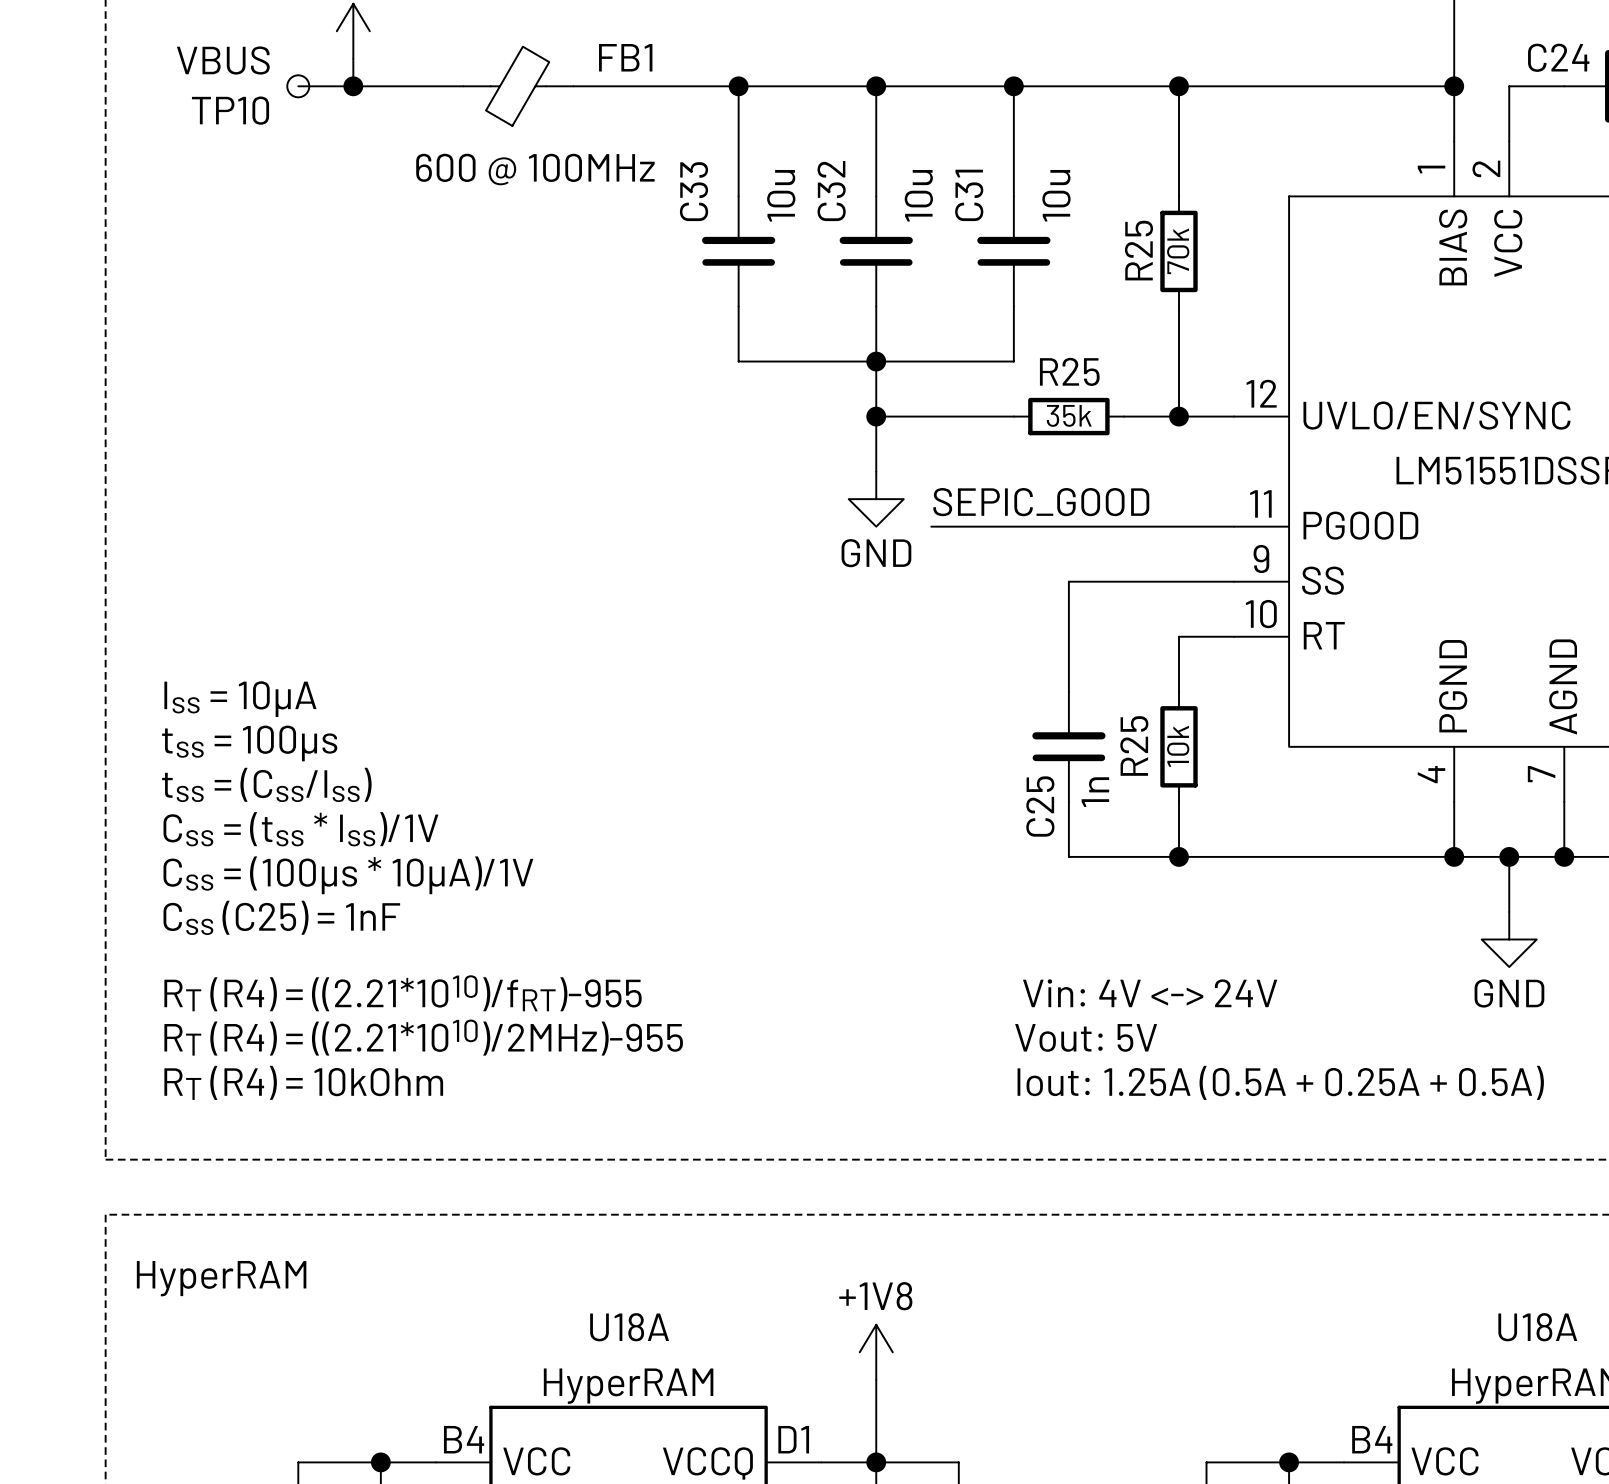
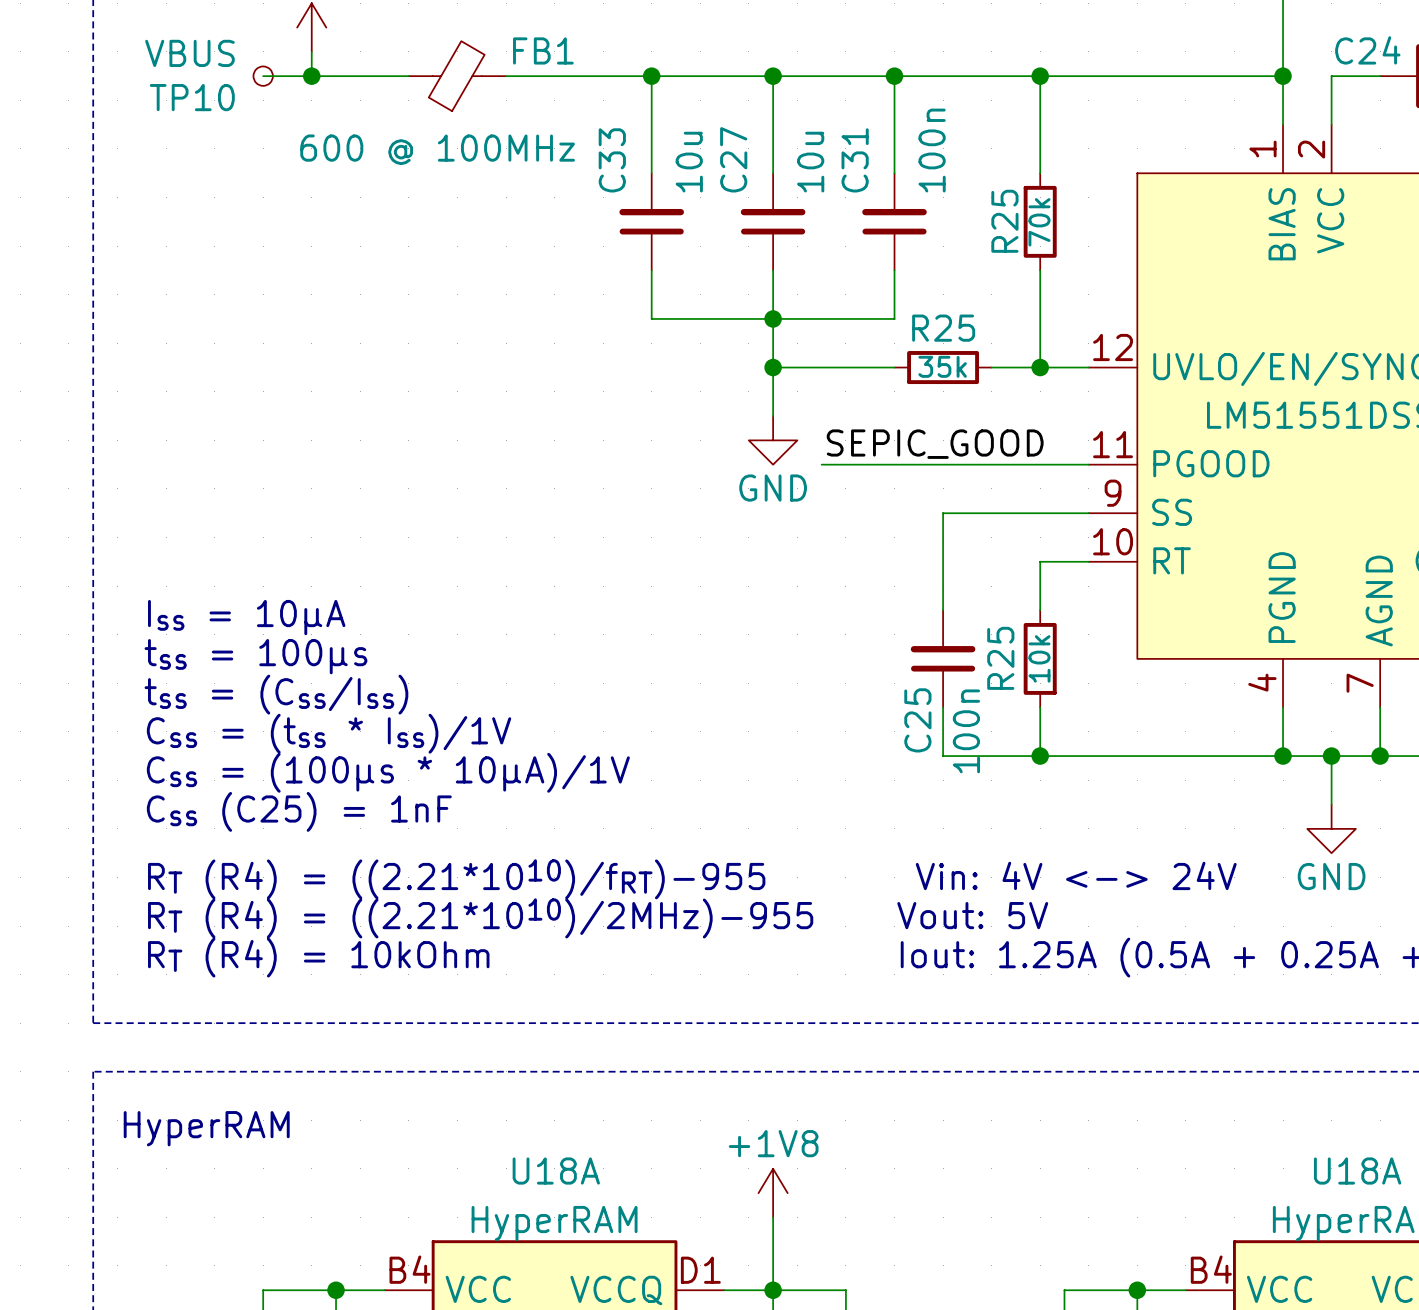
C32 name: C32 (831, 191) -> C27 (733, 159)
C31 value: 10u (1056, 195) -> 100n (932, 150)
C25 value: 1n (1095, 792) -> 100n (966, 731)

